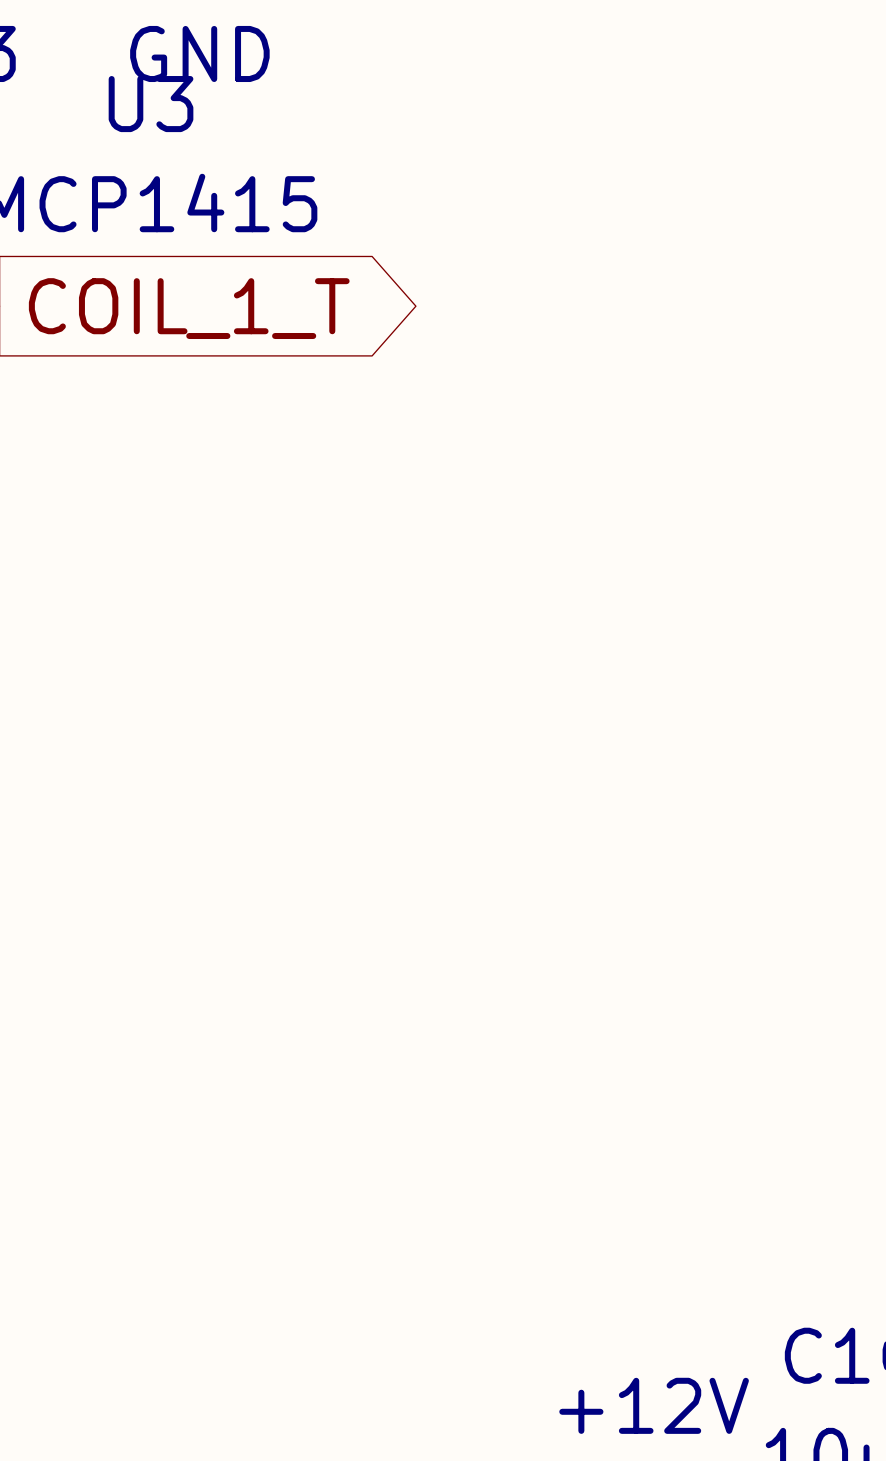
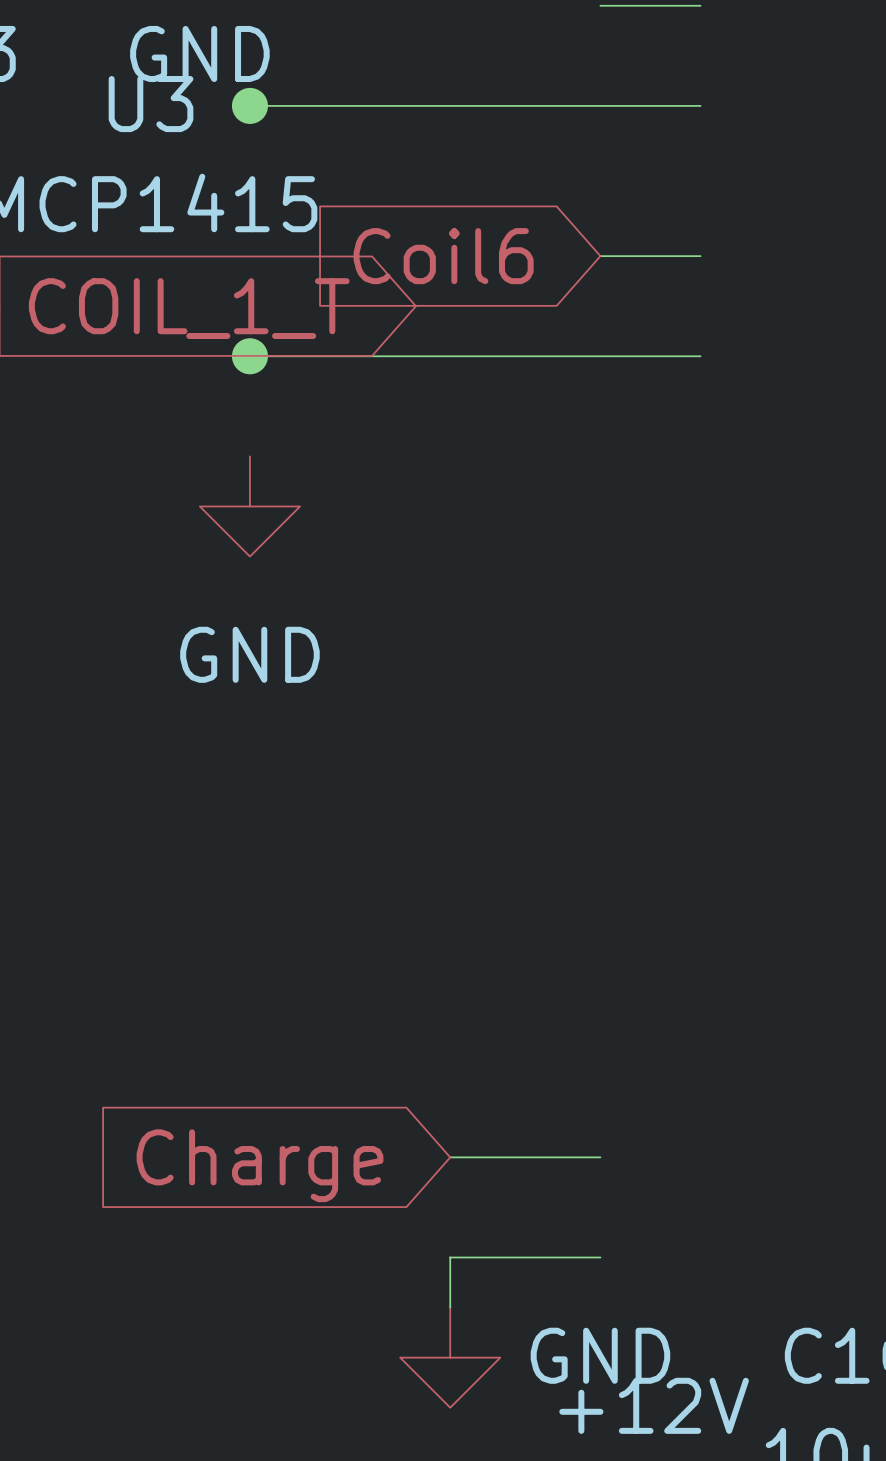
wire: none -> (600, 5) (700, 5)
wire: none -> (249, 105) (700, 105)
junction: none -> (249, 105)
global label: none -> Coil6 (443, 256)
wire: none -> (600, 256) (700, 256)
wire: none -> (249, 356) (700, 356)
junction: none -> (249, 356)
power symbol: none -> GND (249, 506)
wire: none -> (450, 1157) (600, 1157)
global label: none -> Charge (260, 1165)
wire: none -> (600, 1257) (450, 1257) (450, 1307)
power symbol: none -> GND (450, 1357)

